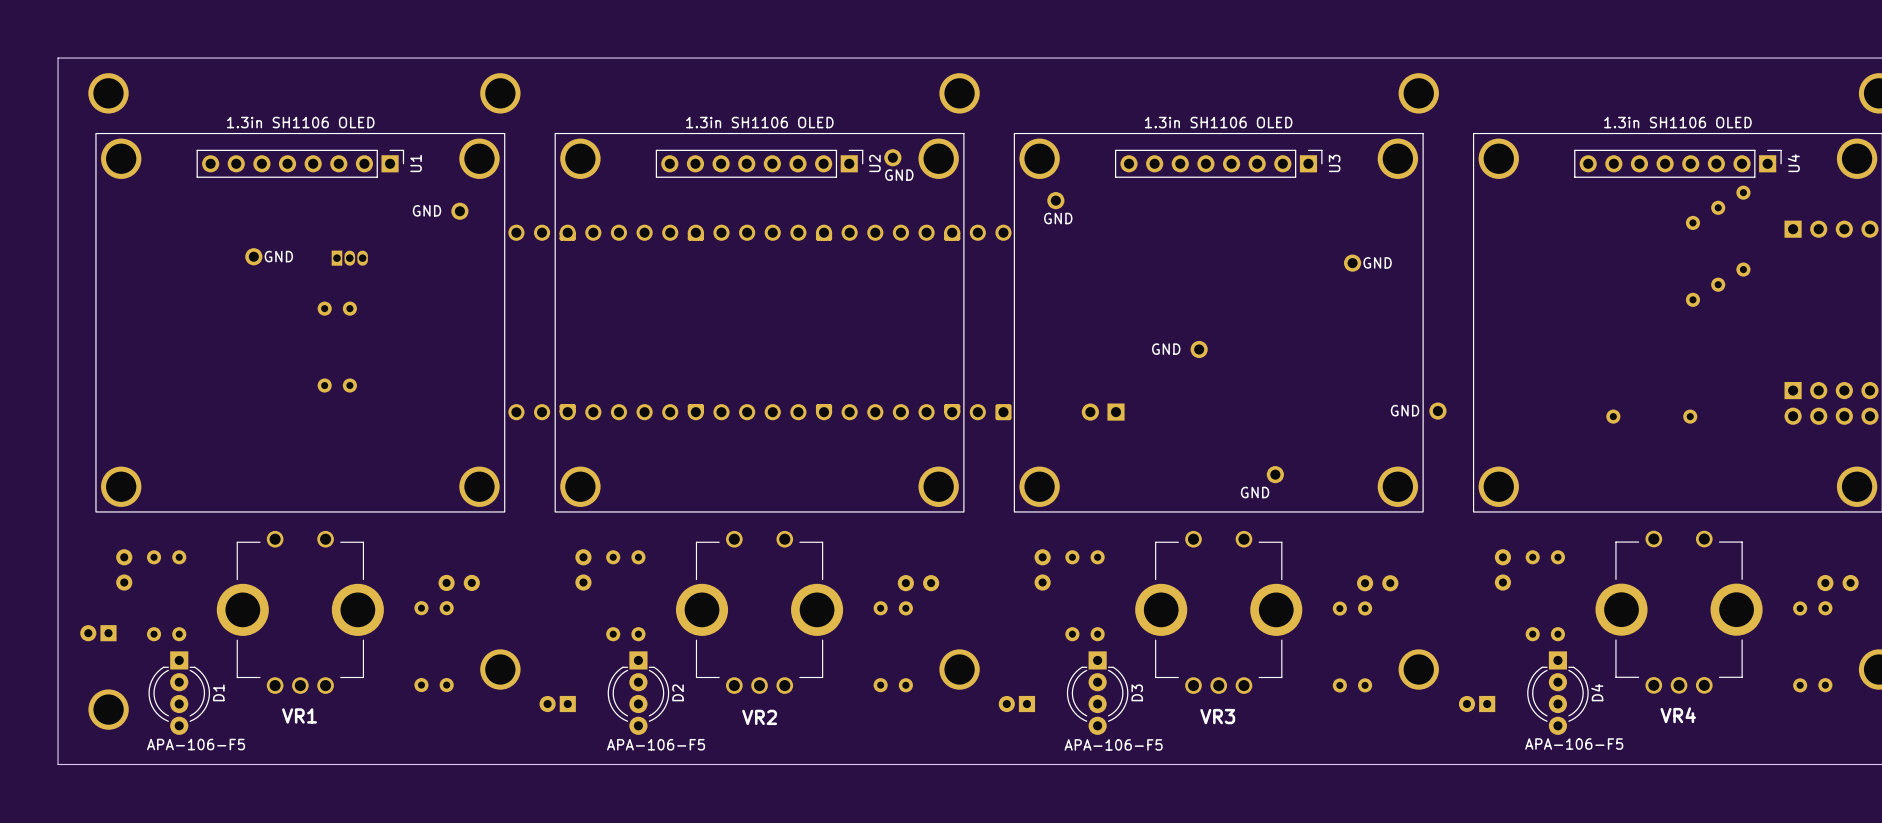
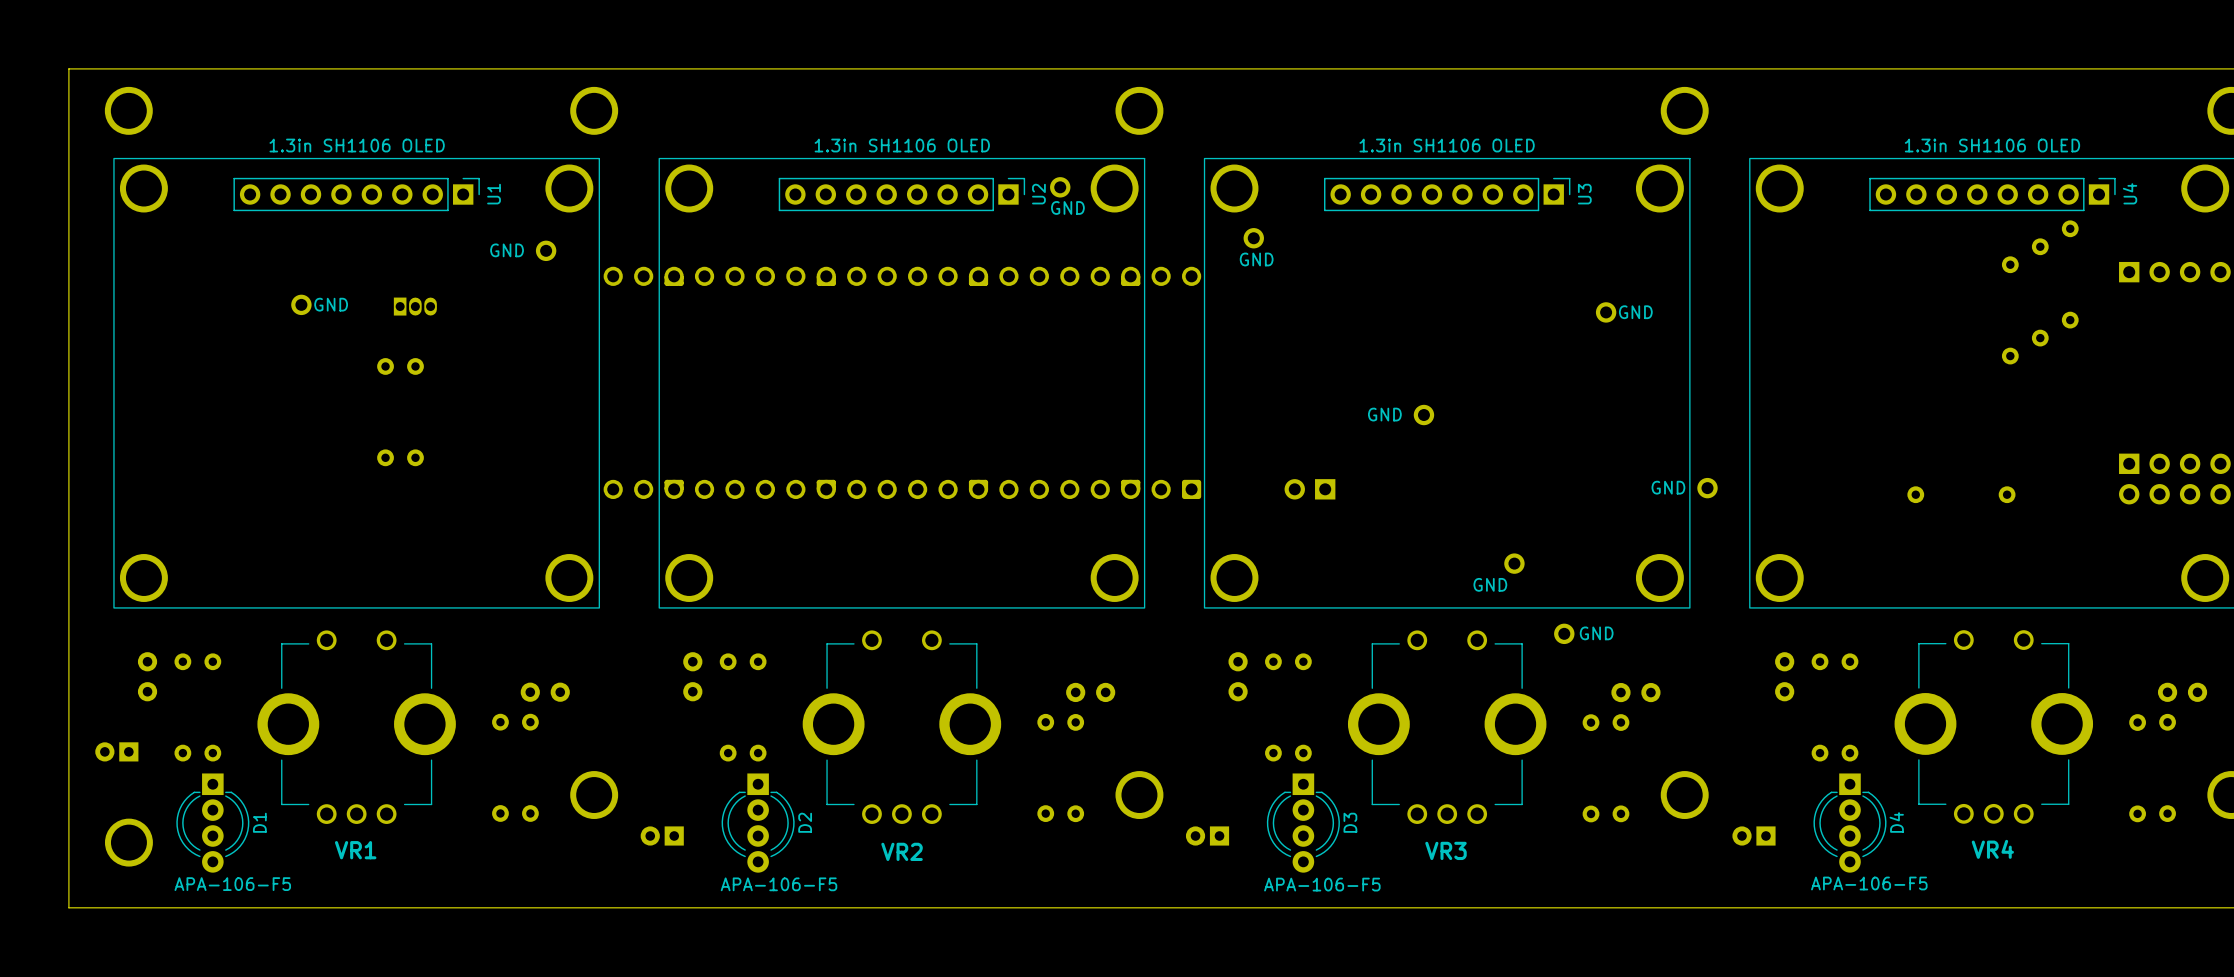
part: none -> (1564, 633)
text: none -> GND (1596, 633)

